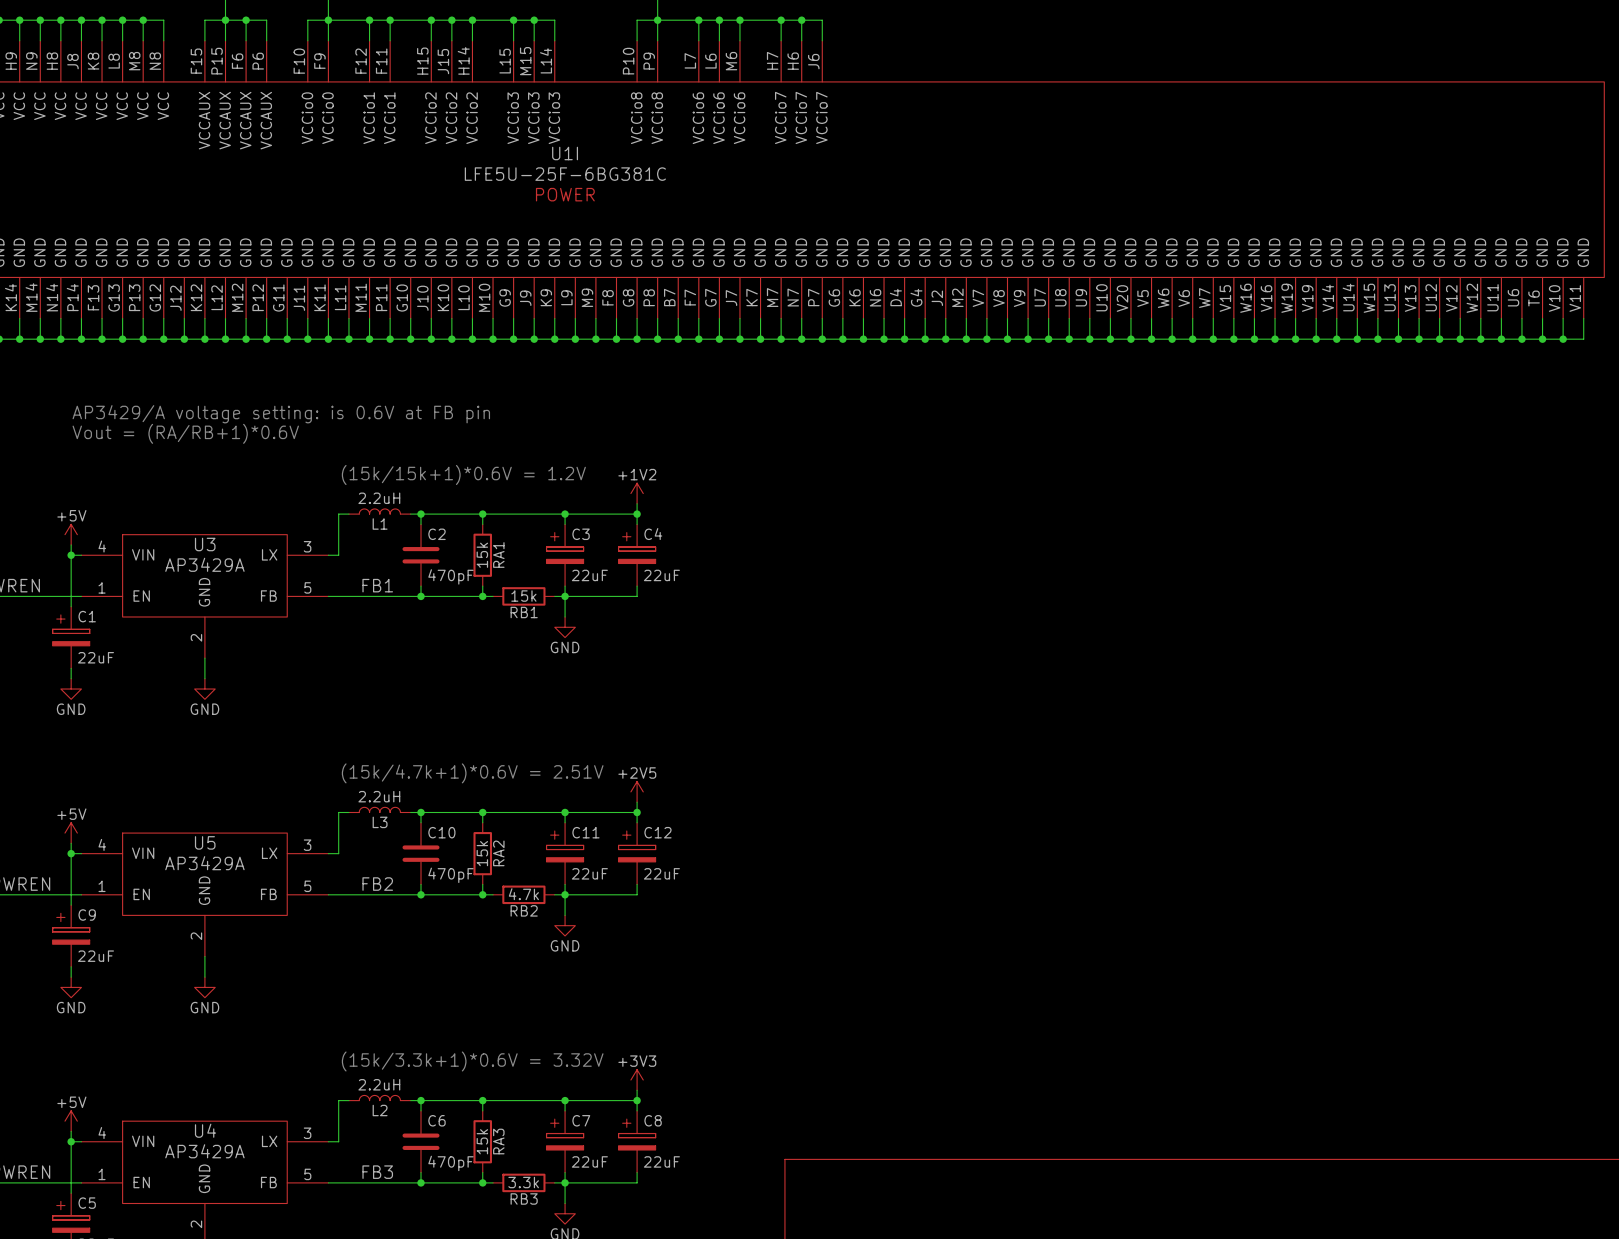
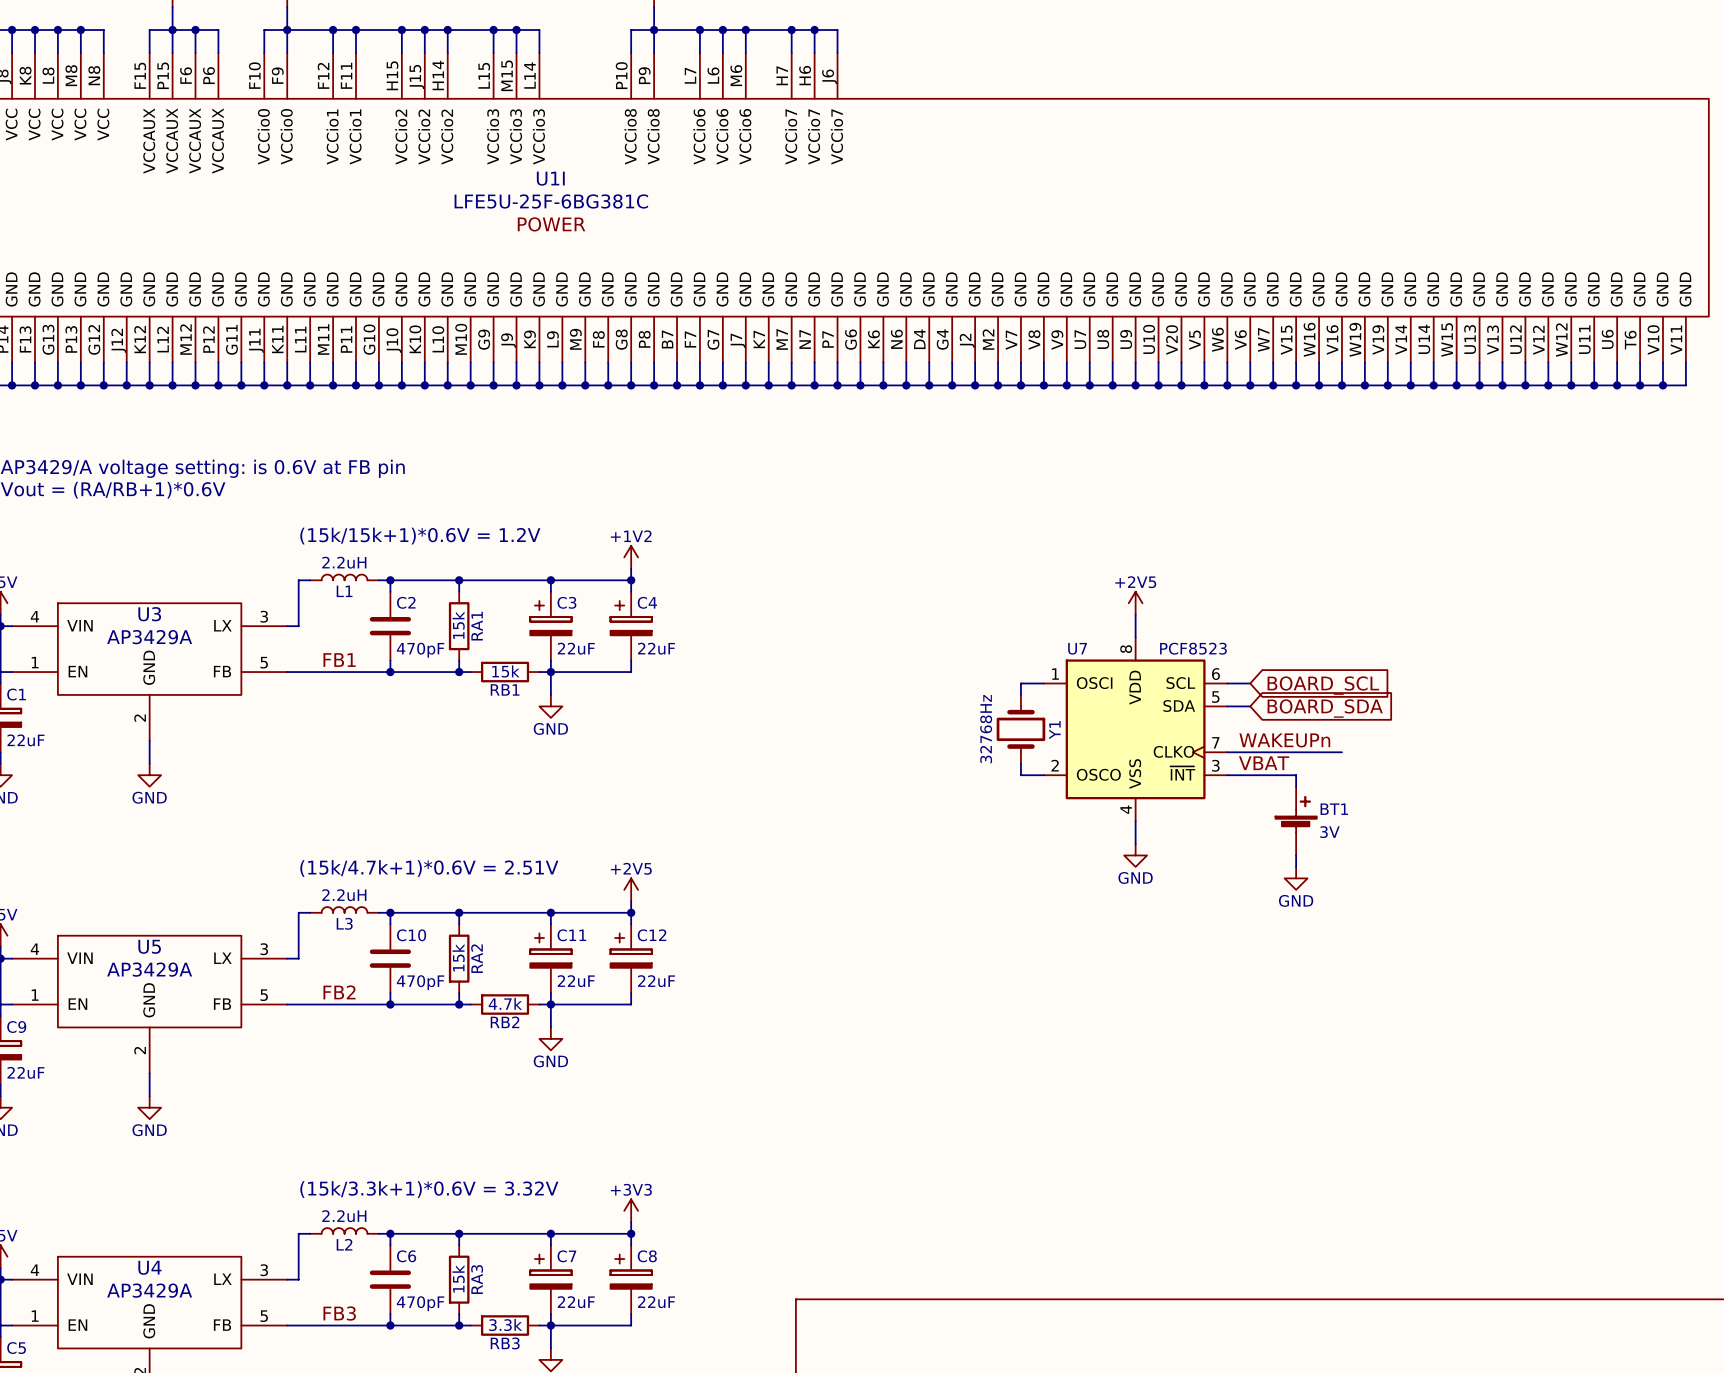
power symbol: none -> +2V5 (1135, 603)
wire: none -> (1135, 614) (1135, 637)
wire: none -> (1043, 683) (1020, 683) (1020, 694)
wire: none -> (1227, 683) (1250, 683)
global label: none -> BOARD_SCL (1323, 685)
wire: none -> (1227, 706) (1250, 706)
global label: none -> BOARD_SDA (1325, 708)
Y1: none -> 32768Hz (1020, 729)
U7: none -> PCF8523 (1135, 729)
label: none -> WAKEUPn (1284, 740)
wire: none -> (1227, 752) (1341, 752)
wire: none -> (1020, 763) (1020, 775) (1043, 775)
label: none -> VBAT (1264, 763)
wire: none -> (1227, 775) (1296, 775) (1296, 786)
wire: none -> (1135, 821) (1135, 844)
BT1: none -> 3V (1296, 821)
power symbol: none -> GND (1135, 855)
wire: none -> (1296, 855) (1296, 866)
power symbol: none -> GND (1296, 878)

